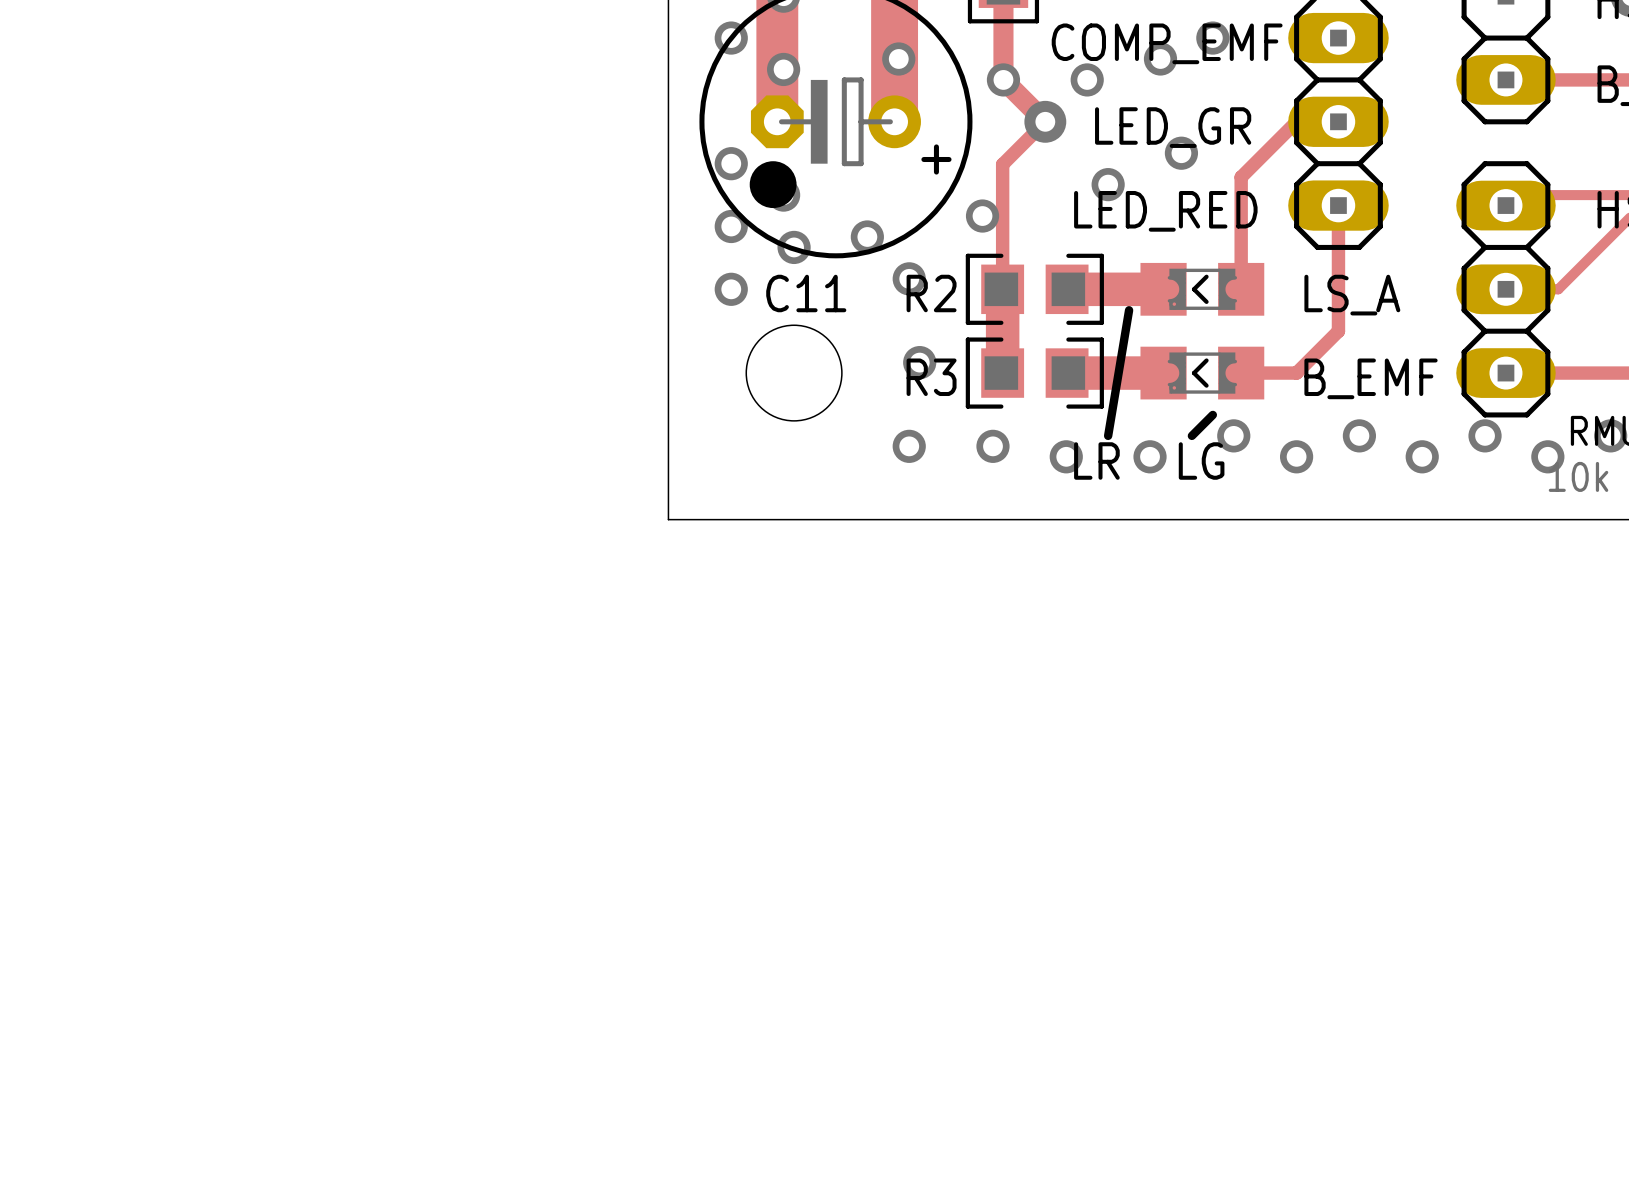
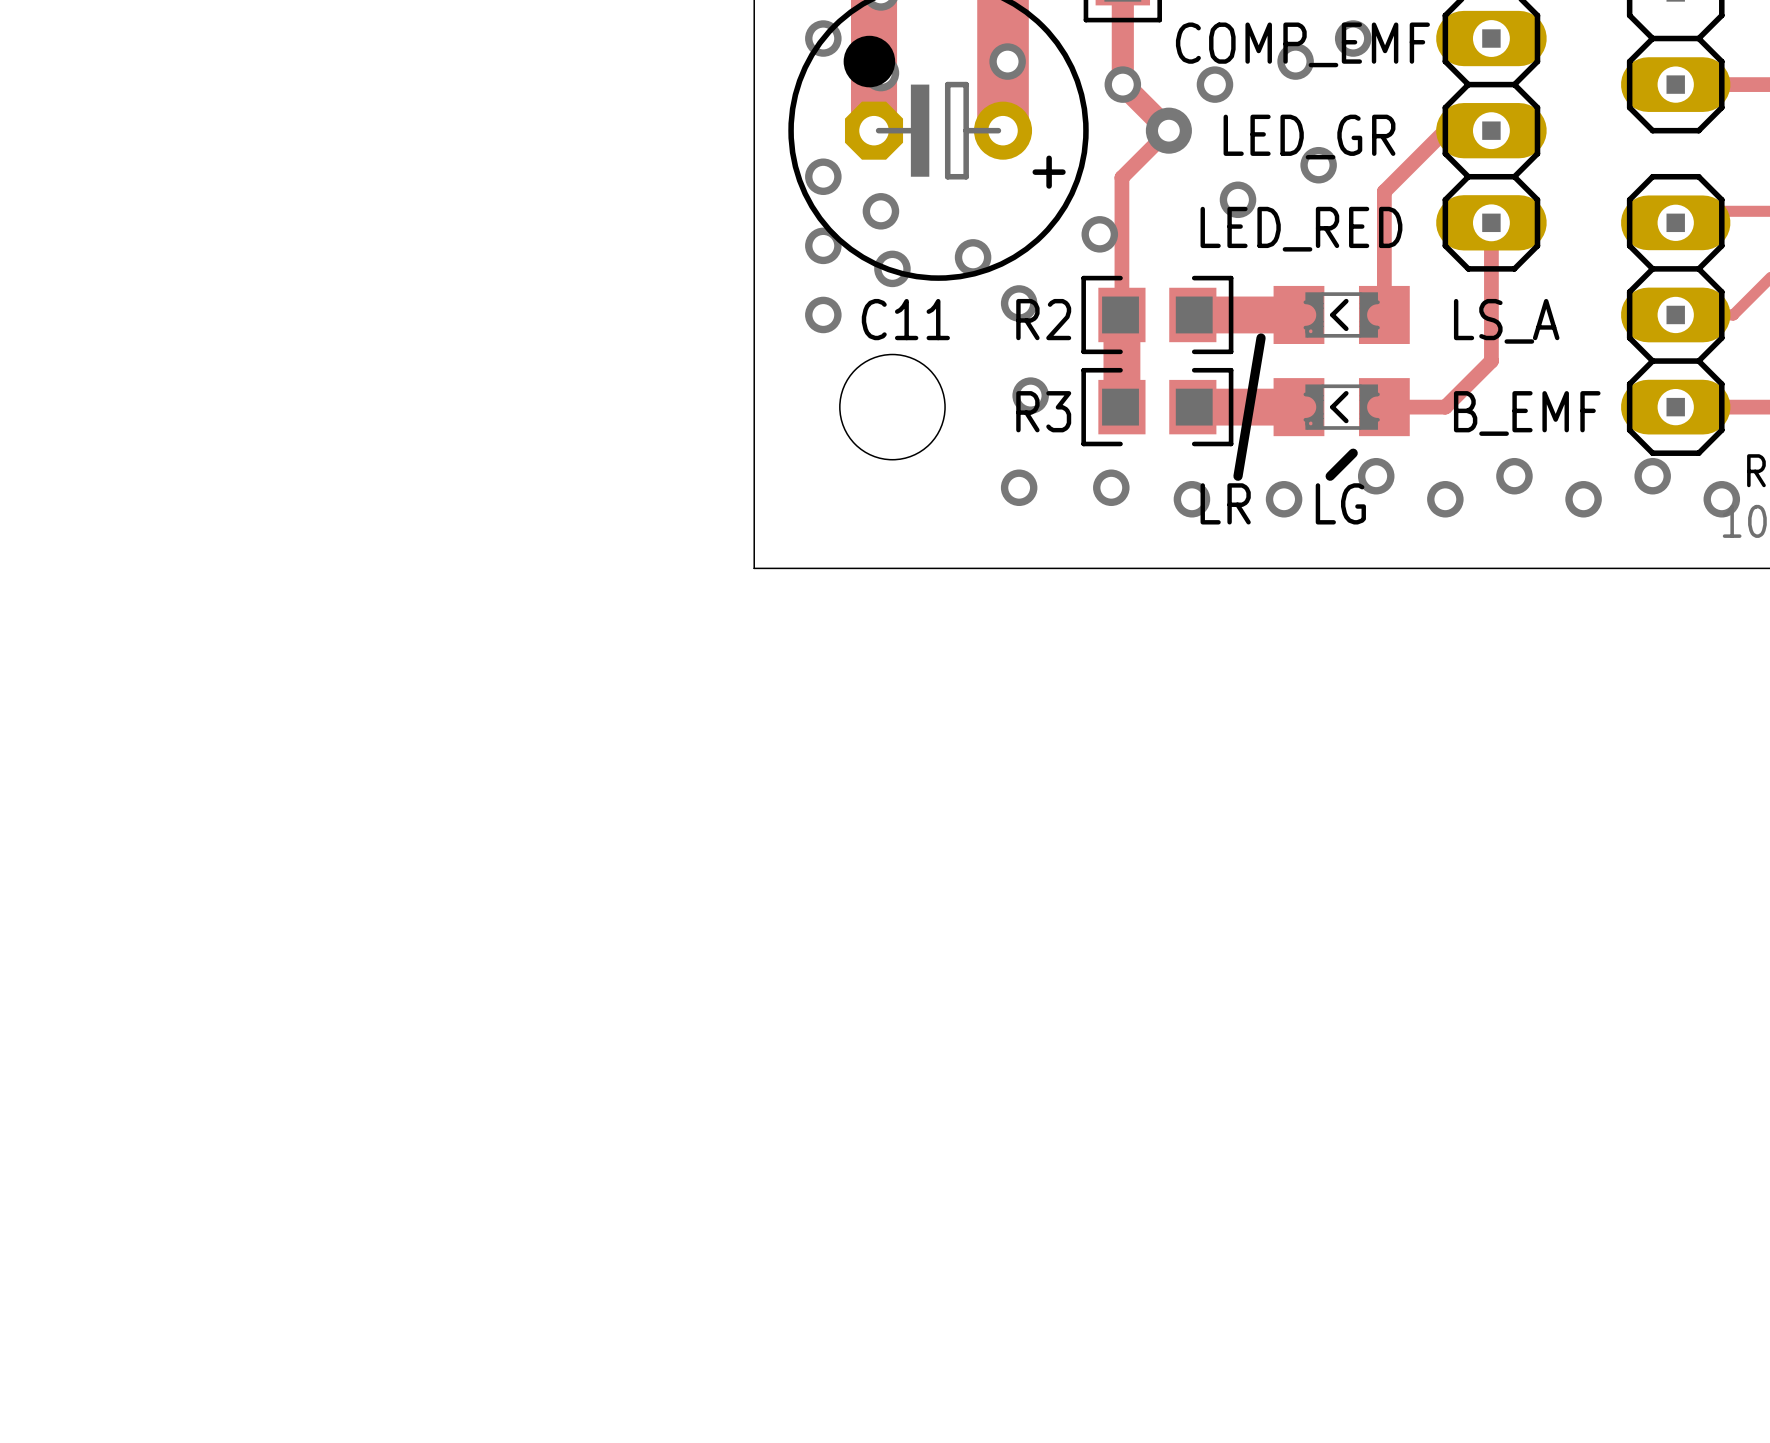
drawing position: (773, 184) -> (869, 61)

